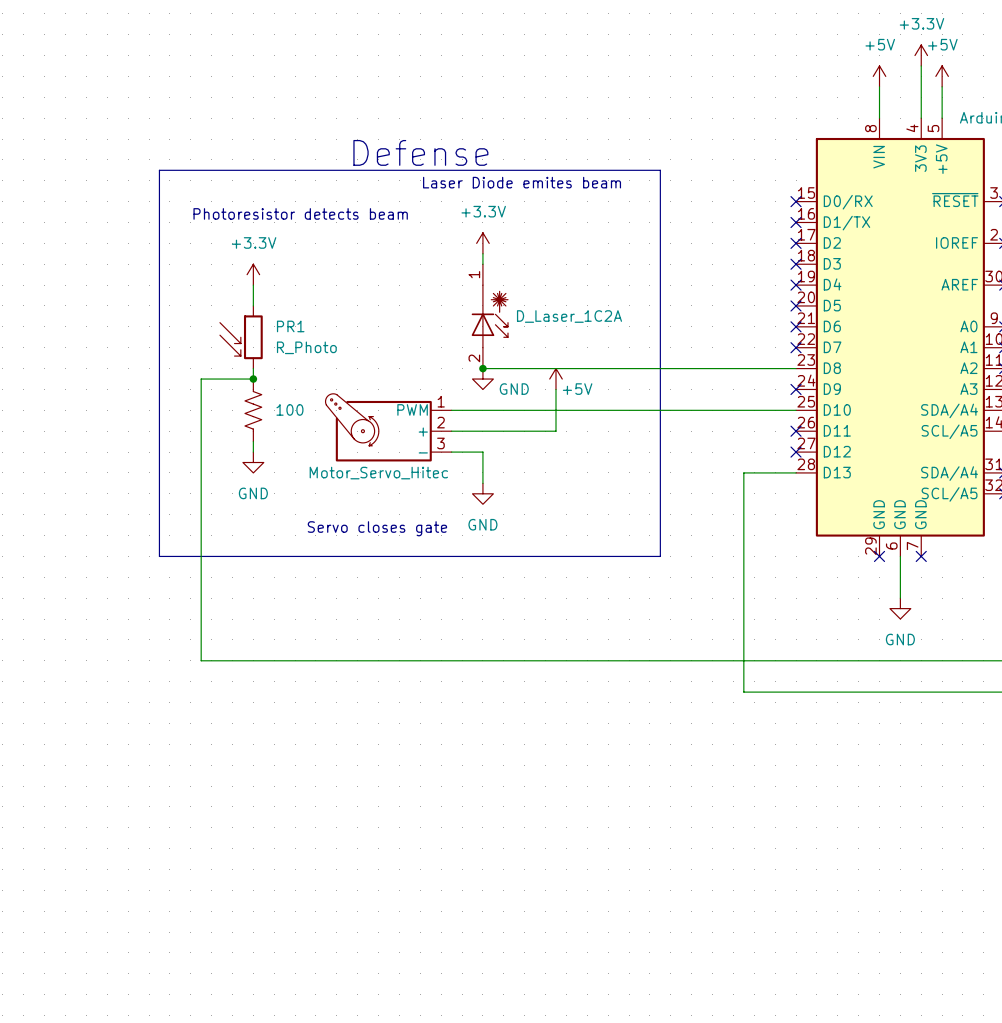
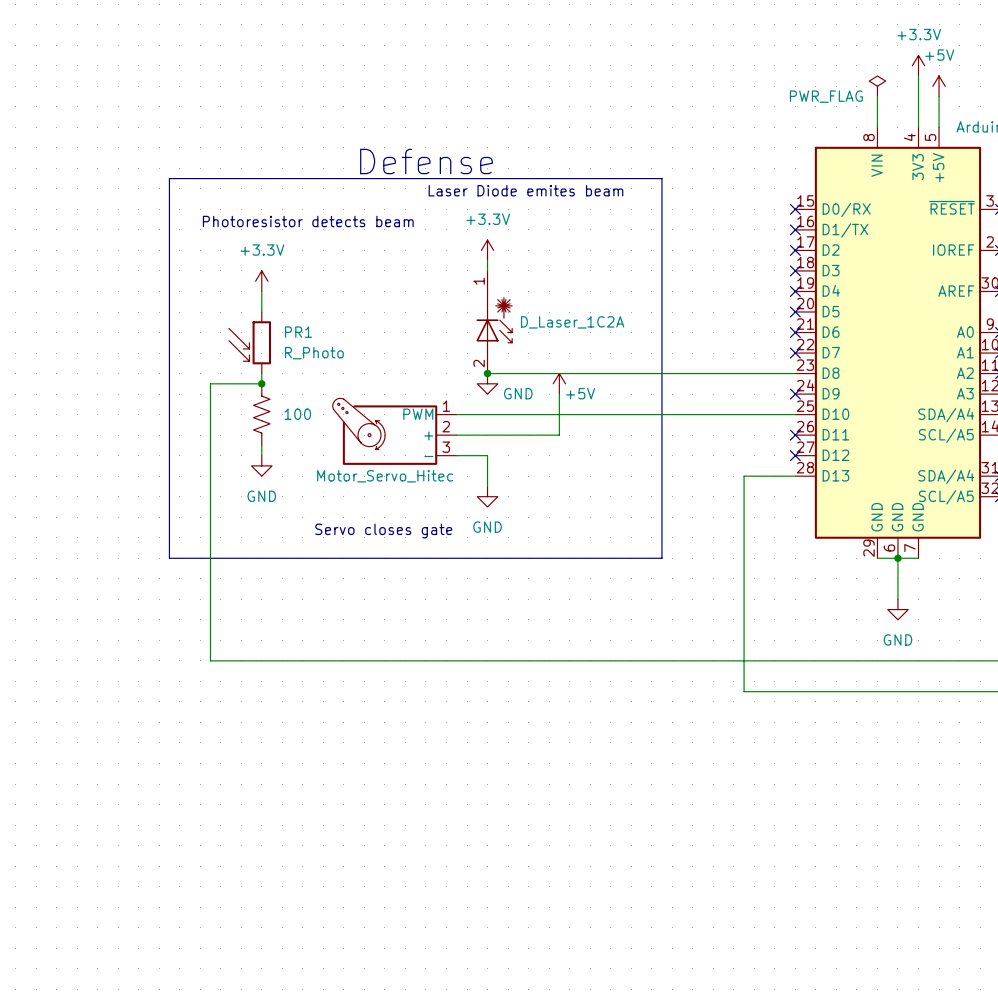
power symbol: +5V (879, 76) -> PWR_FLAG (877, 86)
wire: none -> (877, 558) (918, 558)
no-connect mark: (879, 556) -> none
junction: none -> (897, 558)
no-connect mark: (921, 556) -> none

